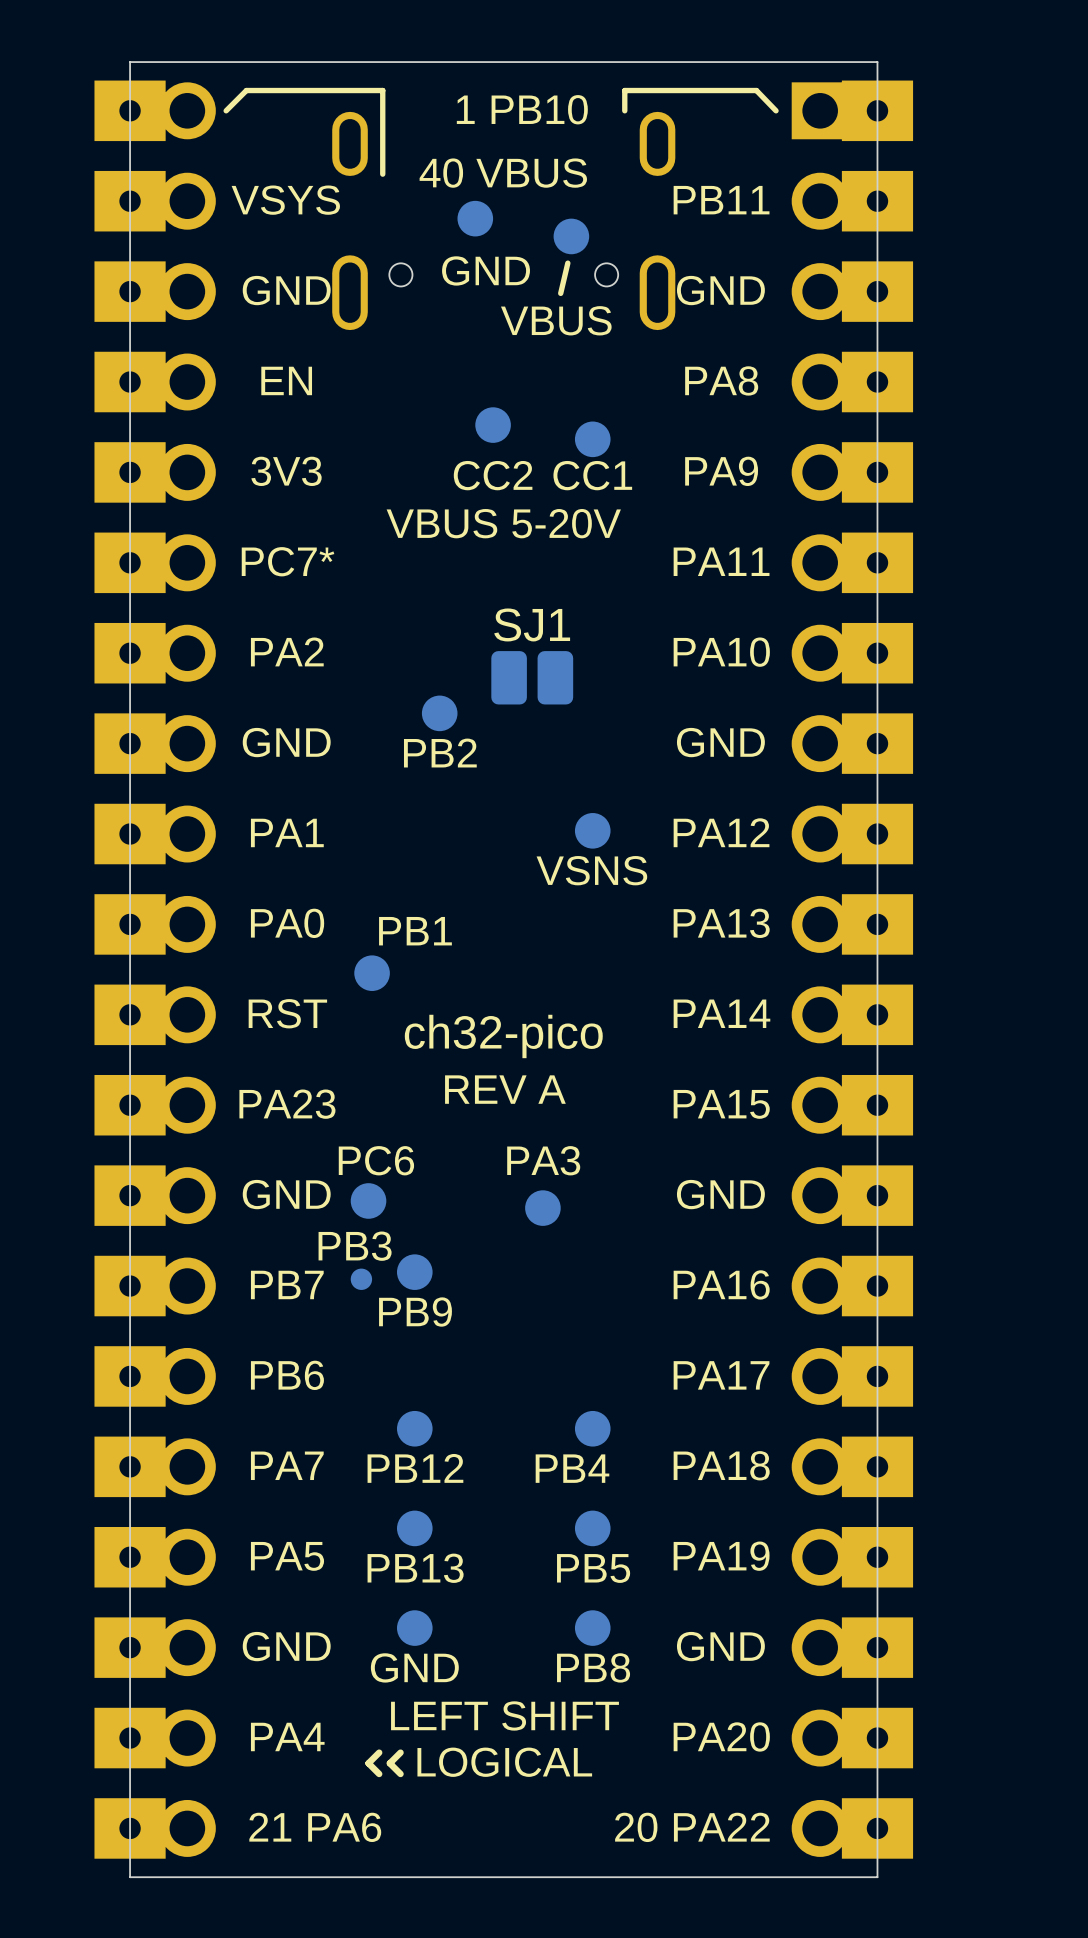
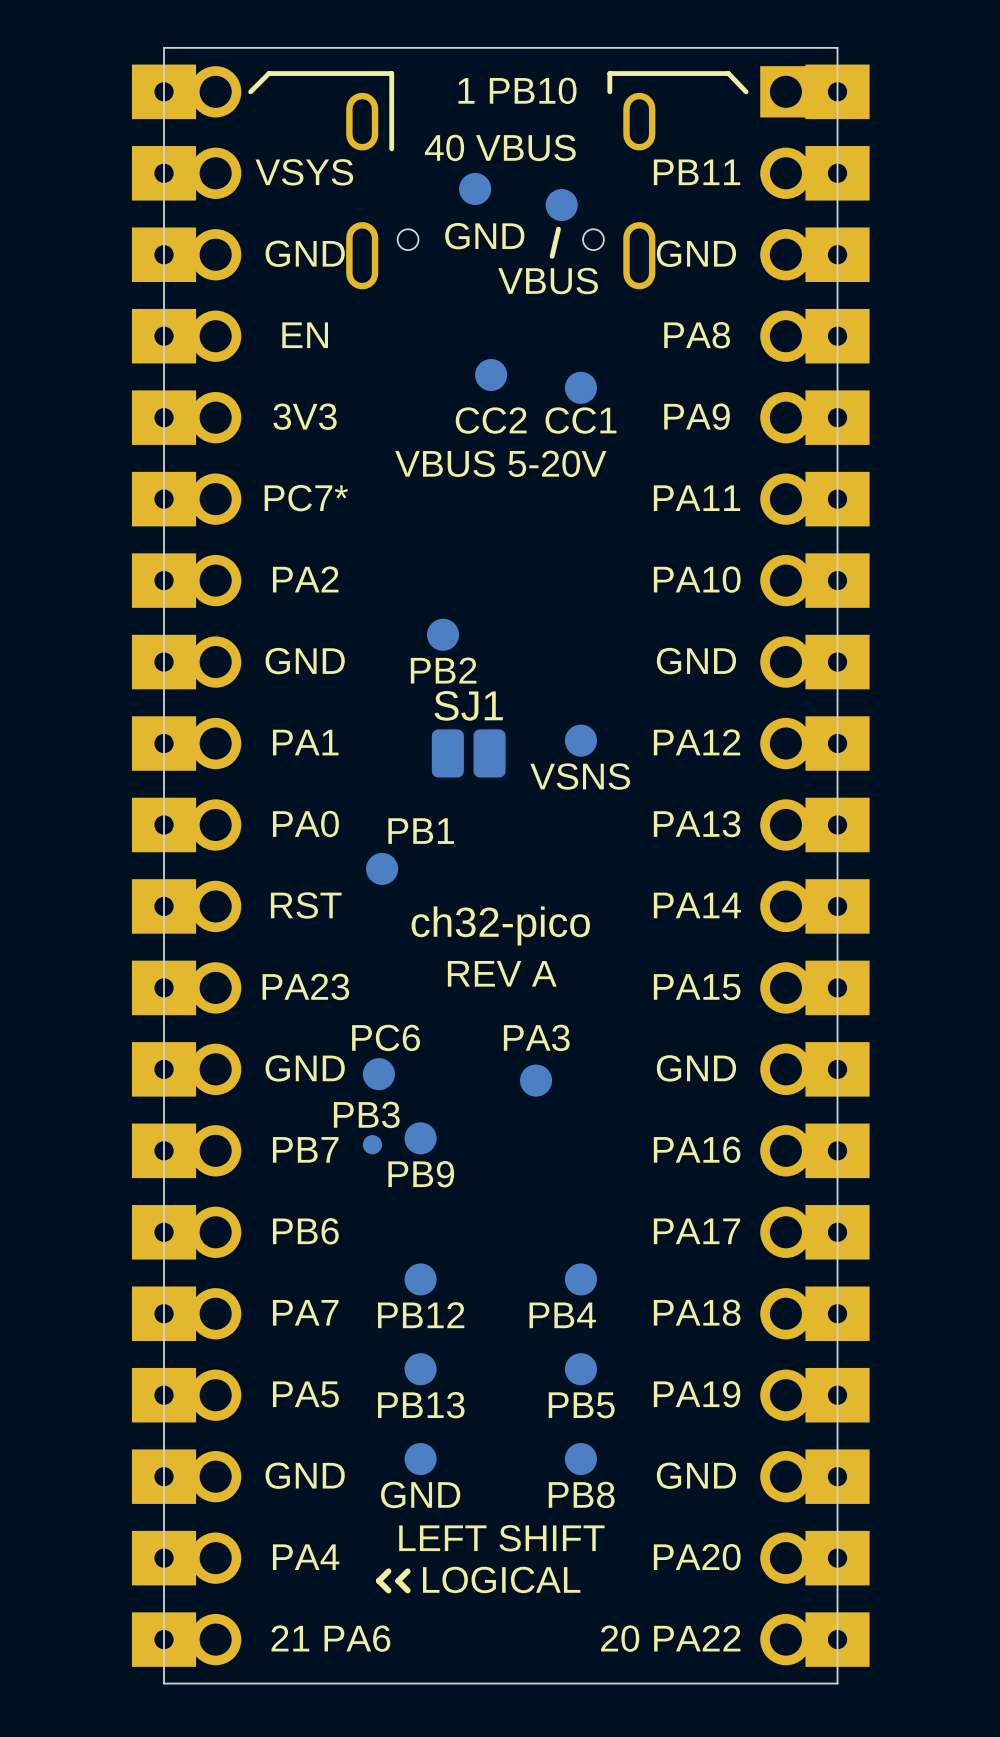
text position: SJ1 (532, 624) -> SJ1 (468, 705)
part position: (532, 677) -> (468, 753)

